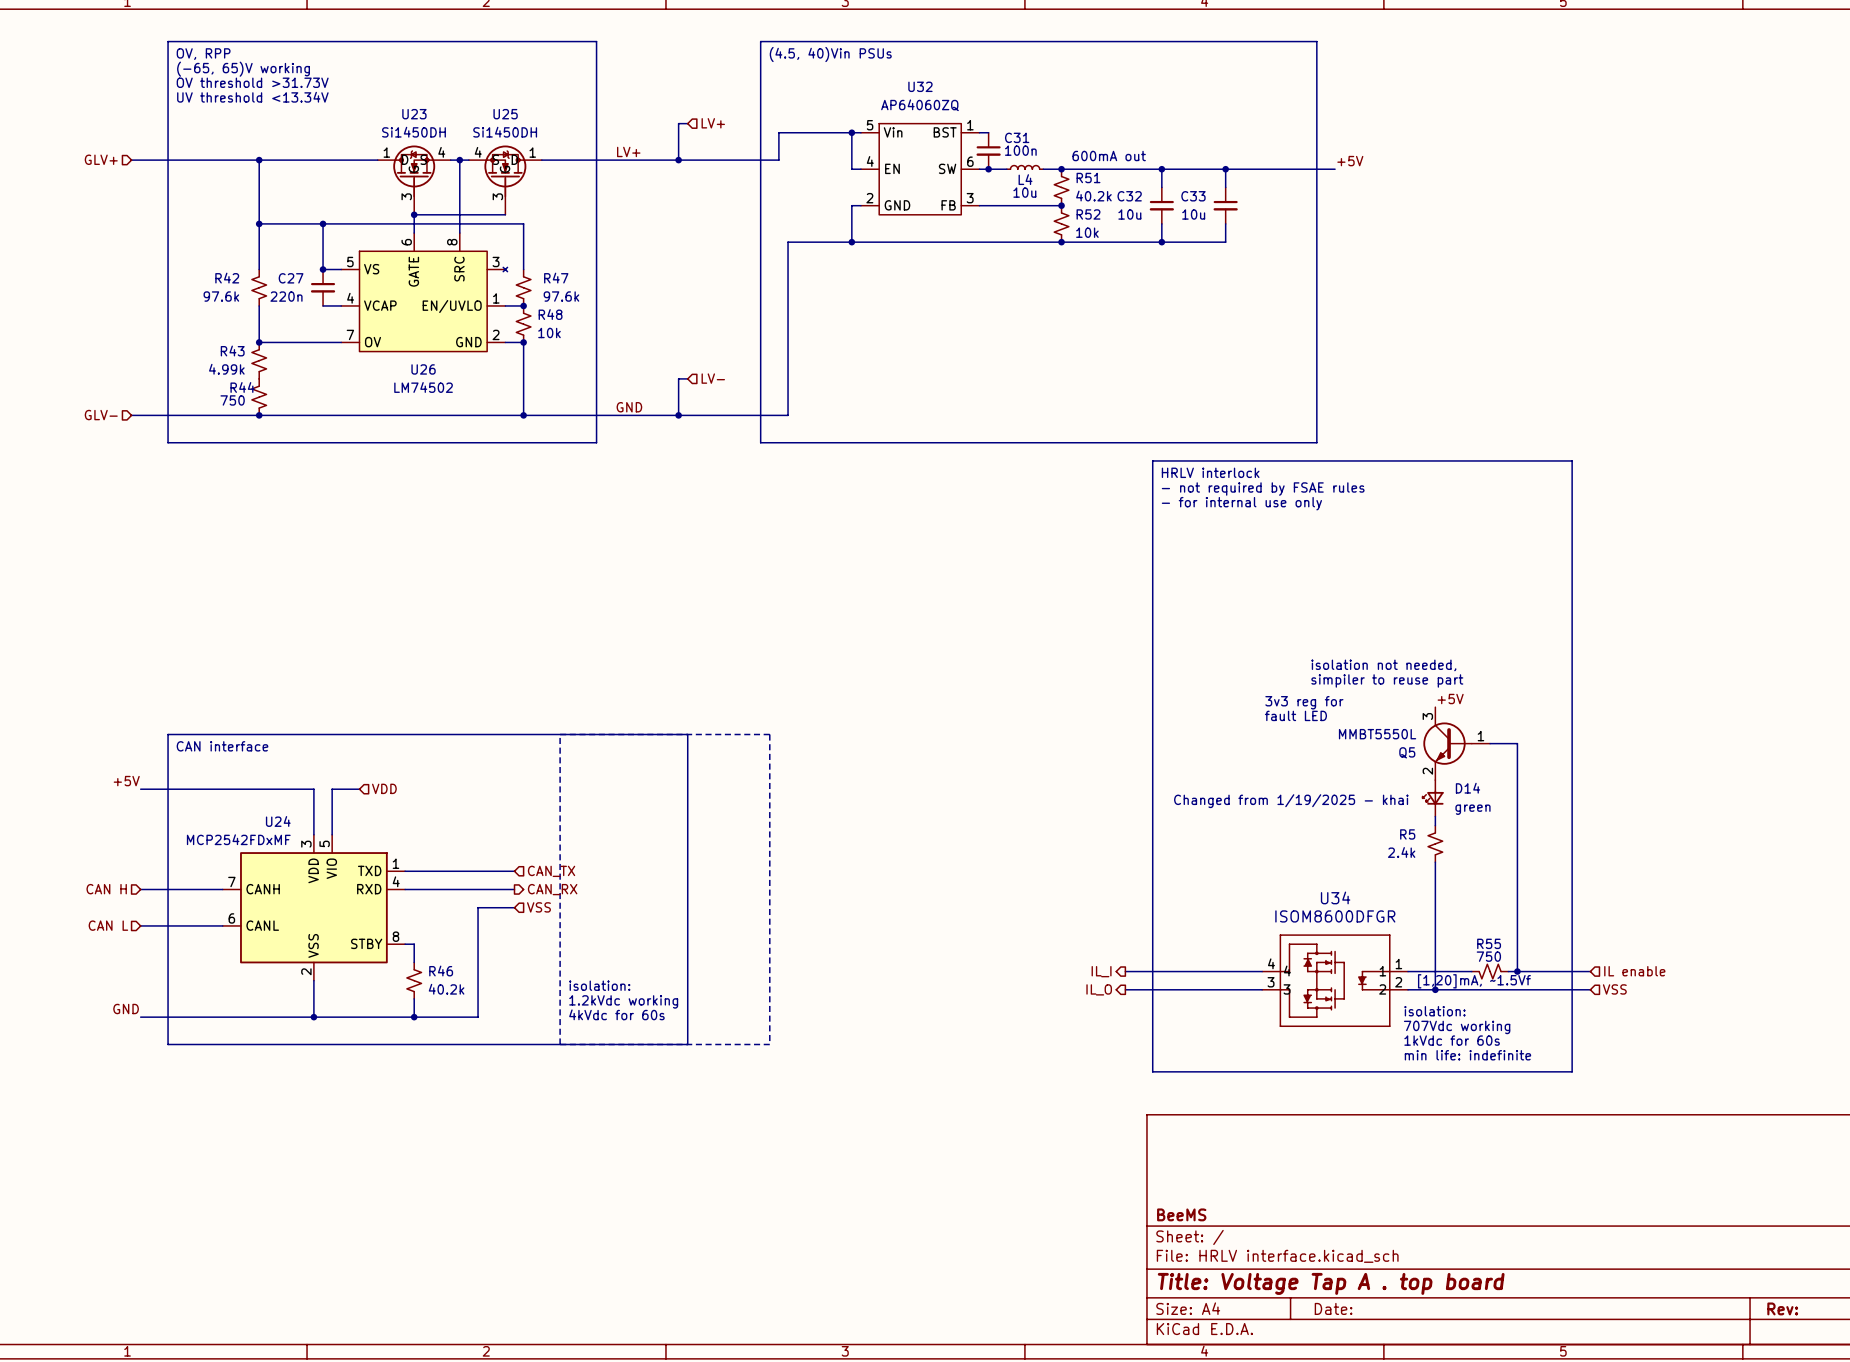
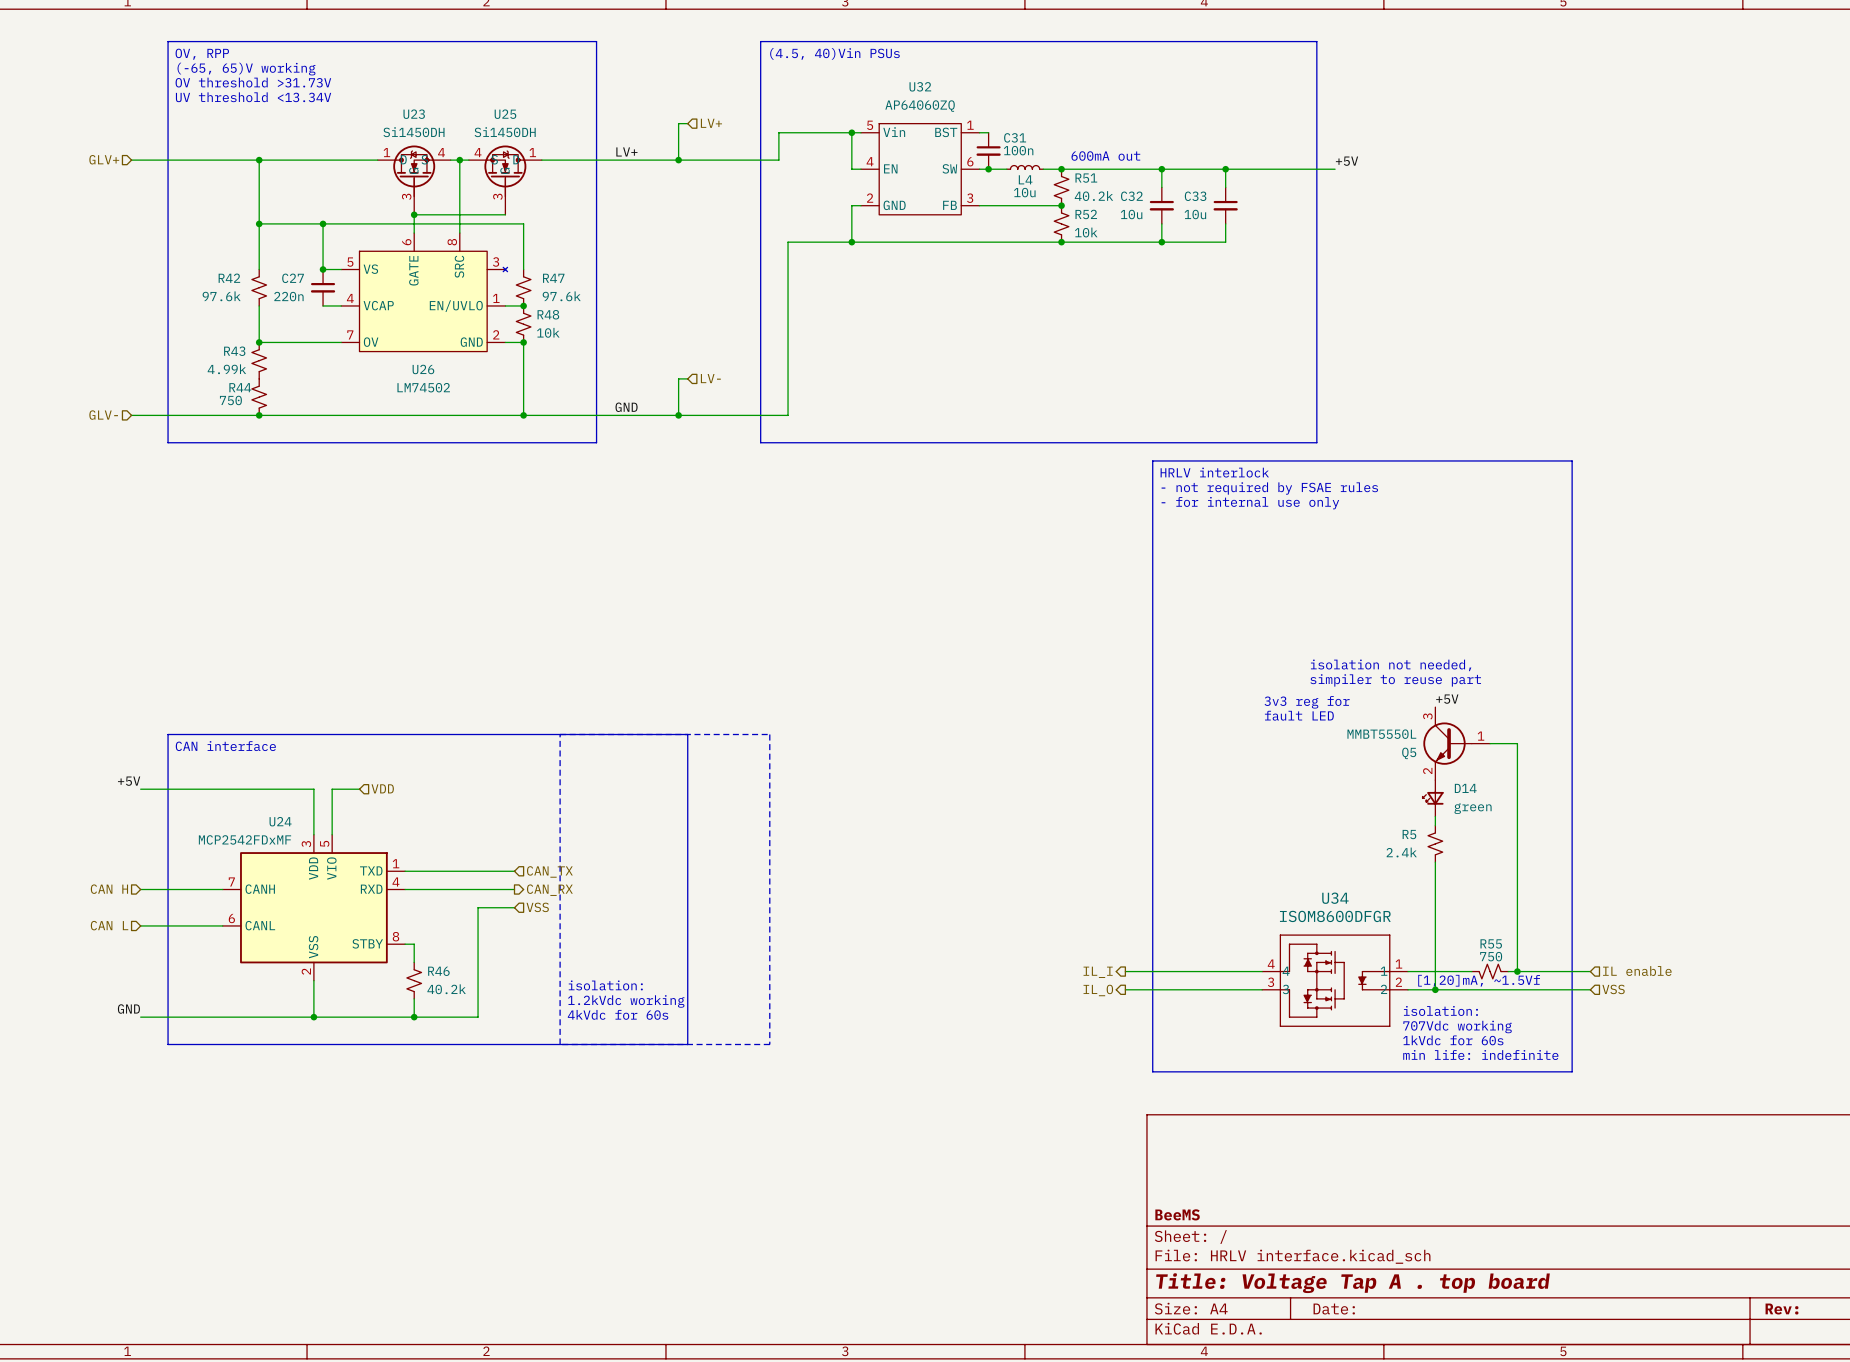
text: Changed from 1/19/2025 - khai (1291, 801) -> none

